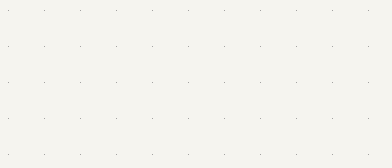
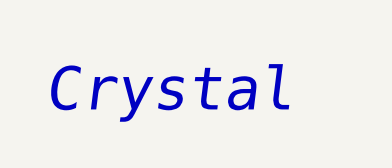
text: none -> Crystal (169, 92)

